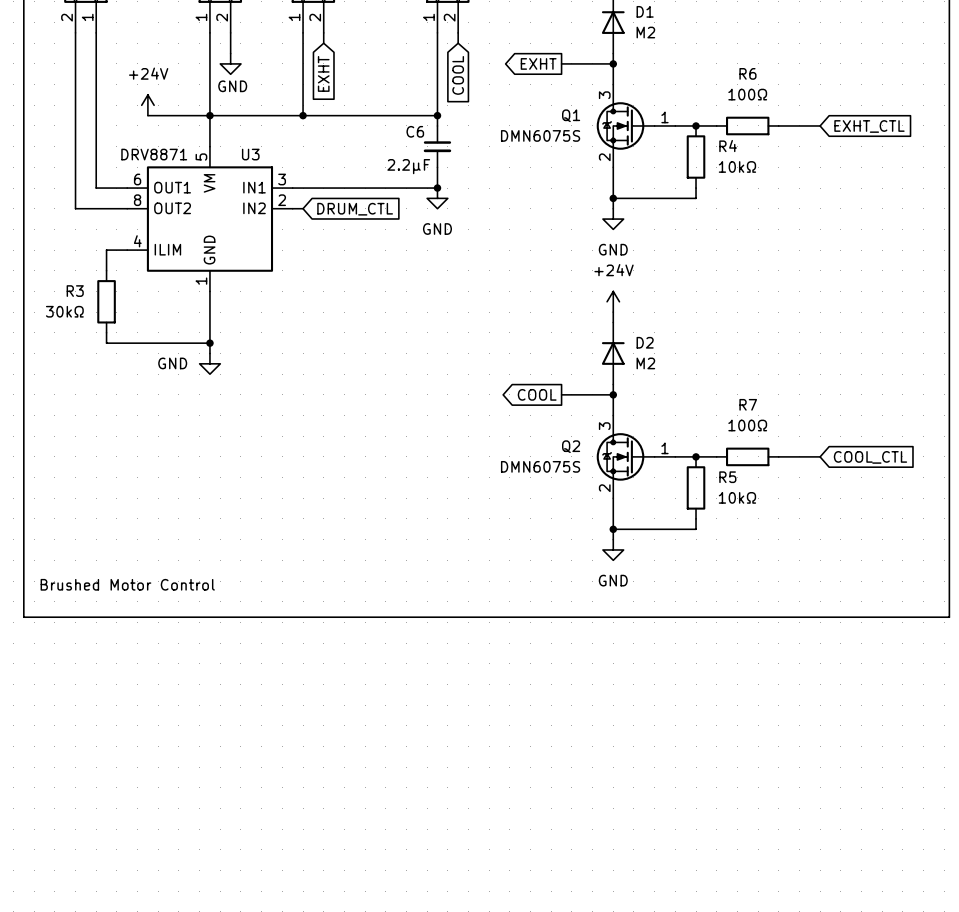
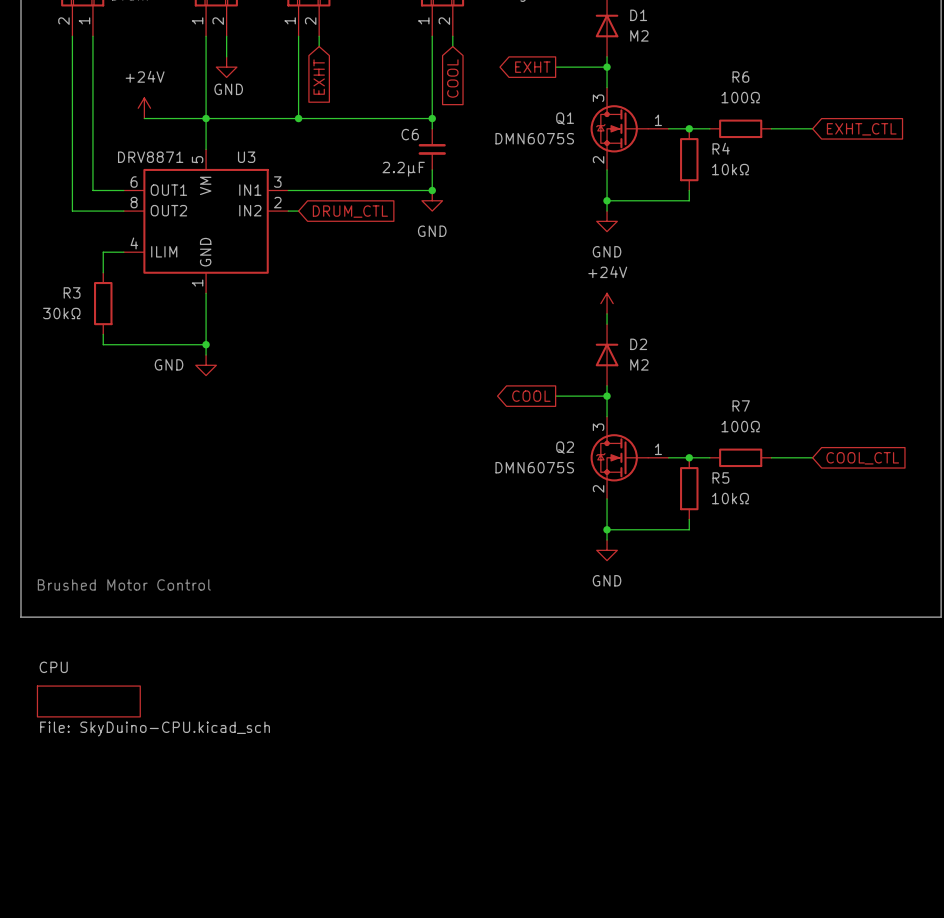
sheet CPU: none -> File: SkyDuino-CPU.kicad_sch (88, 701)

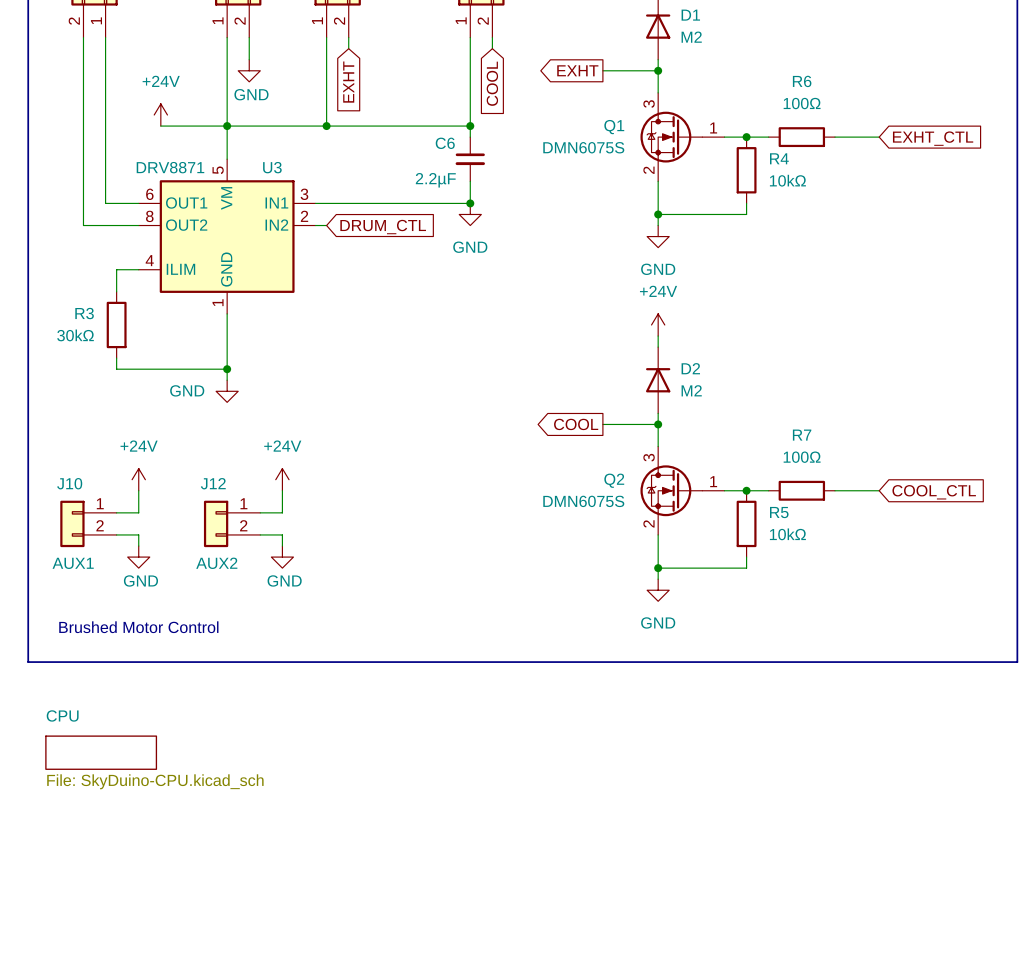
power symbol: none -> +24V (138, 479)
power symbol: none -> +24V (282, 479)
wire: none -> (138, 490) (138, 512) (116, 512)
wire: none -> (282, 490) (282, 512) (260, 512)
J10: none -> AUX1 (88, 523)
J12: none -> AUX2 (232, 523)
wire: none -> (116, 534) (138, 534) (138, 546)
wire: none -> (260, 534) (282, 534) (282, 546)
power symbol: none -> GND (138, 557)
power symbol: none -> GND (282, 557)

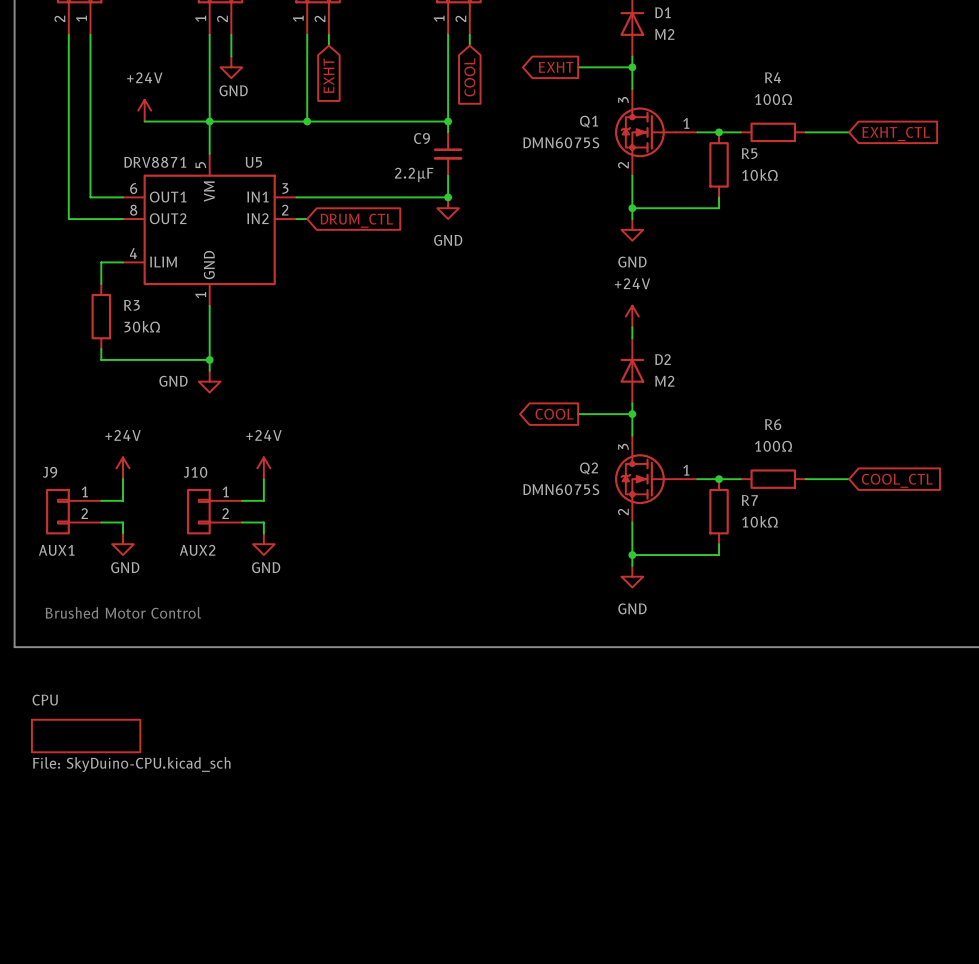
R6 name: R6 (802, 81) -> R4 (773, 77)
C6 name: C6 (445, 143) -> C9 (422, 138)
R4 name: R4 (779, 158) -> R5 (749, 153)
U3 name: U3 (272, 167) -> U5 (253, 162)
R3 name position: R3 (84, 313) -> R3 (131, 305)
R3 value position: 30kΩ (75, 335) -> 30kΩ (142, 326)
R7 name: R7 (802, 435) -> R6 (773, 424)
J10 name: J10 (69, 483) -> J9 (49, 472)
J12 name: J12 (213, 483) -> J10 (195, 472)
R5 name: R5 (779, 512) -> R7 (749, 500)

